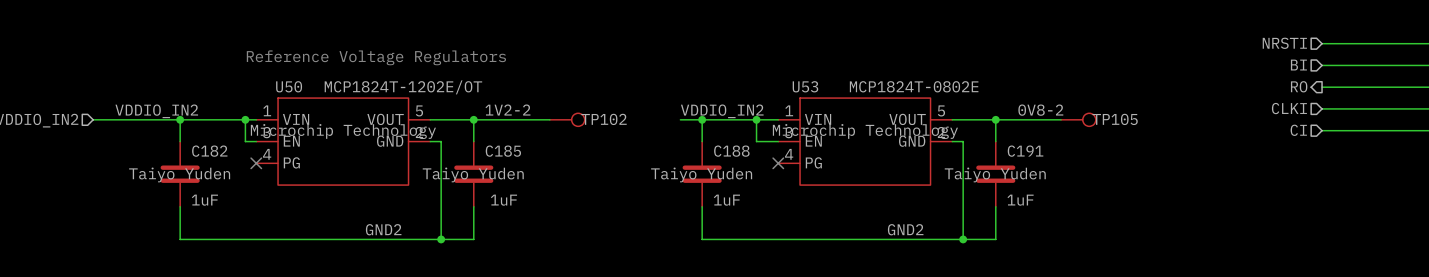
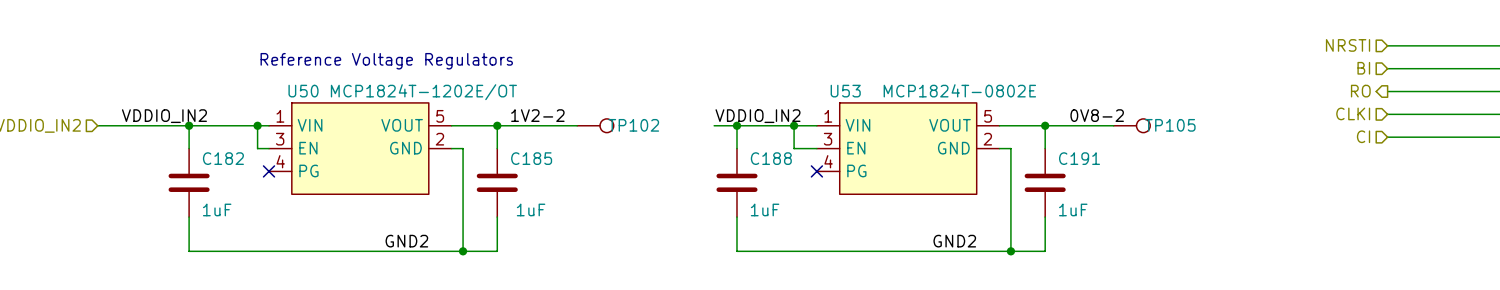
U50 text: Microchip Technology (343, 131) -> none
U53 text: Microchip Technology (865, 131) -> none
C182 text: Taiyo Yuden (179, 174) -> none
C185 text: Taiyo Yuden (473, 174) -> none
C188 text: Taiyo Yuden (701, 174) -> none
C191 text: Taiyo Yuden (995, 174) -> none

